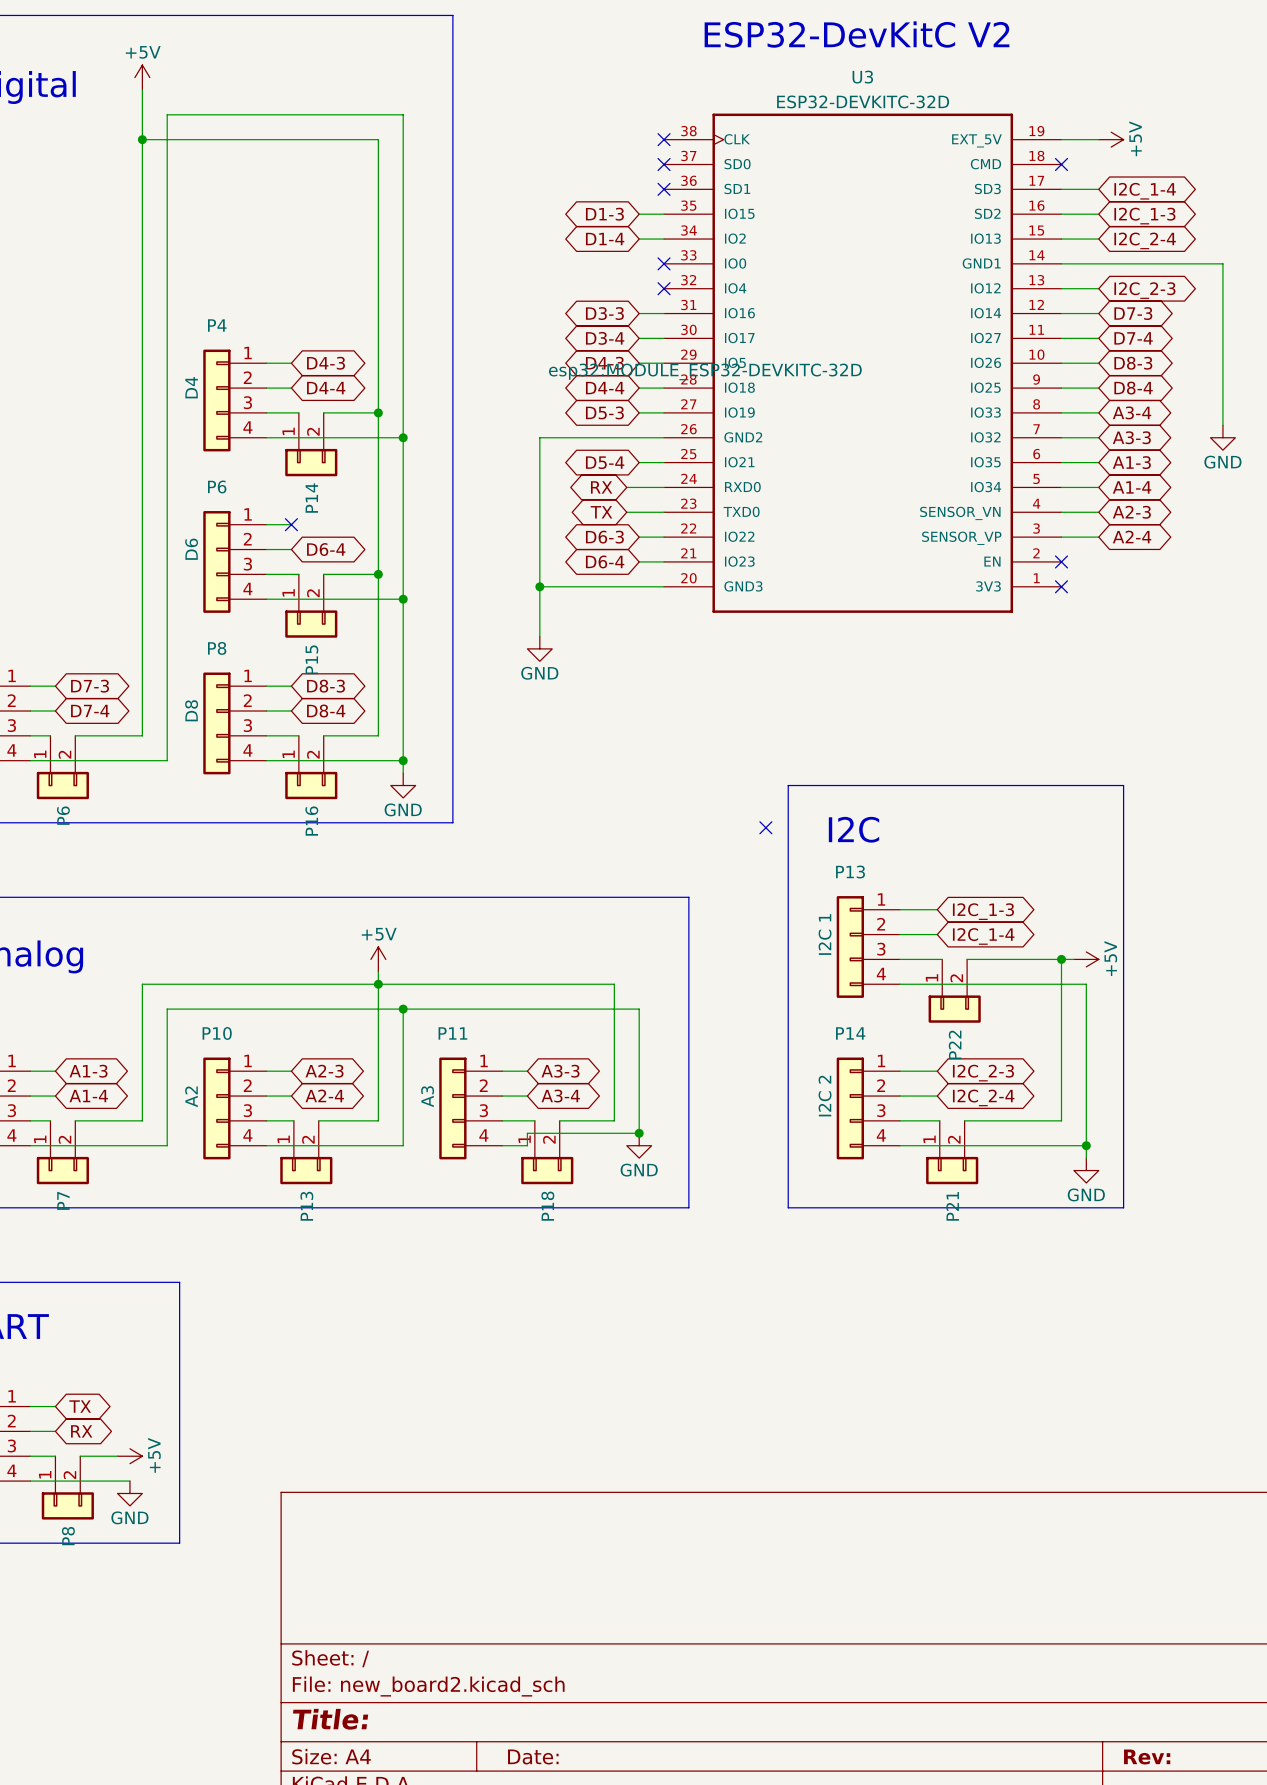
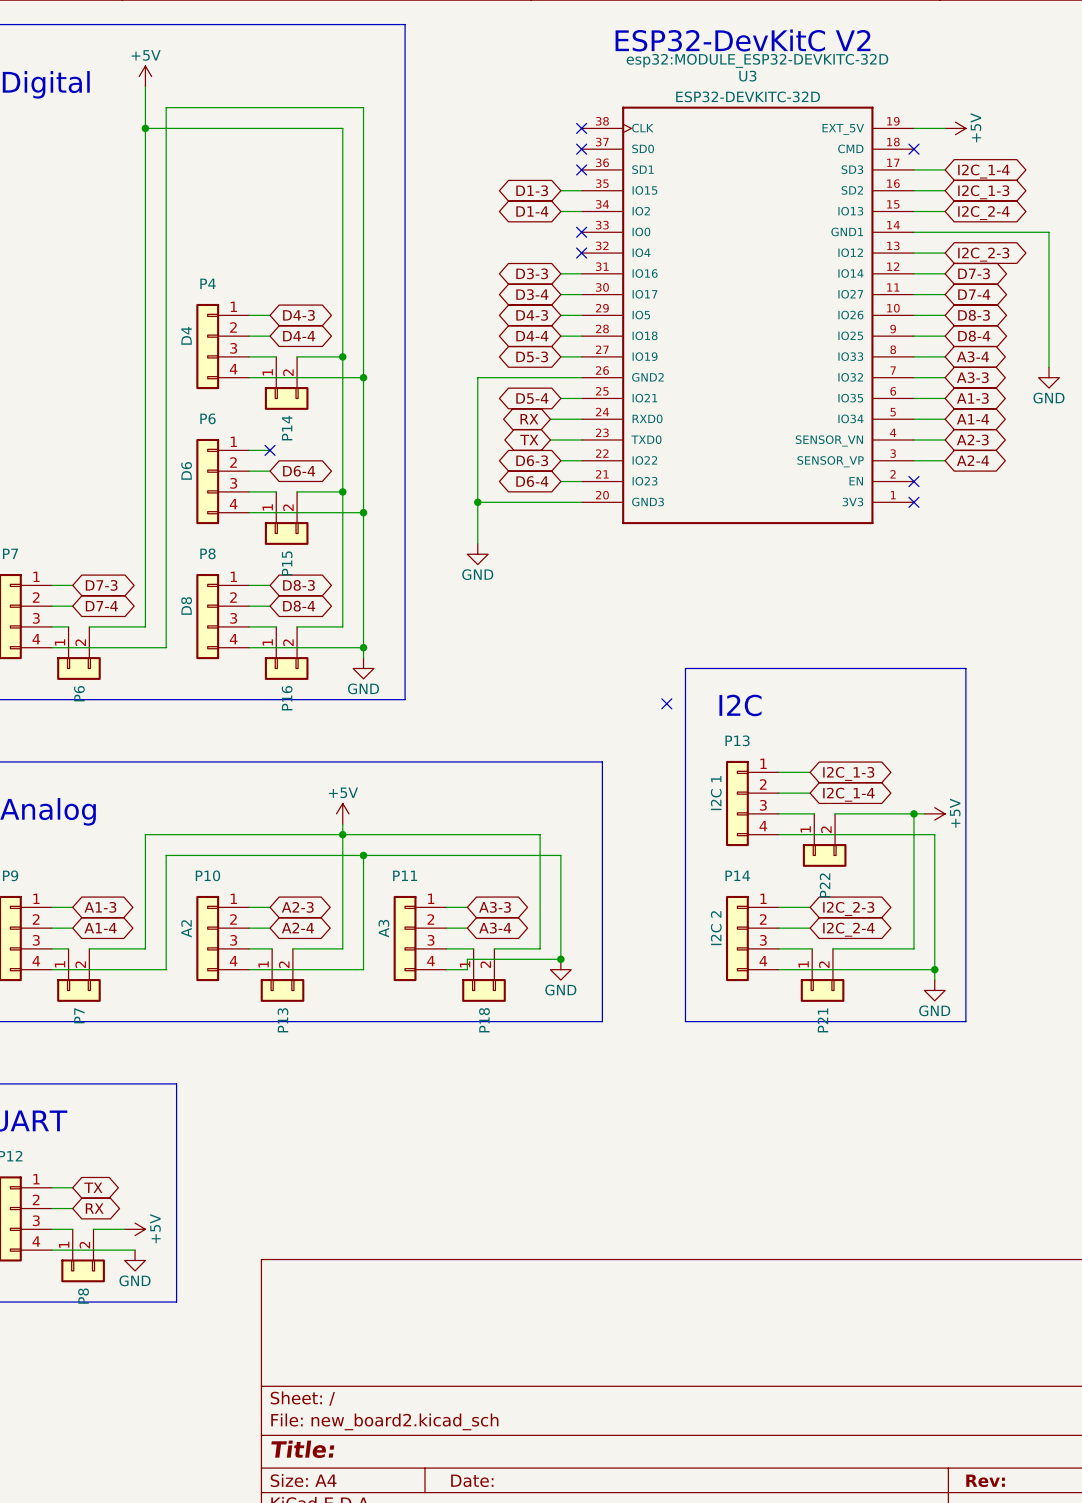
U3 text position: esp32:MODULE_ESP32-DEVKITC-32D (705, 371) -> esp32:MODULE_ESP32-DEVKITC-32D (757, 60)

